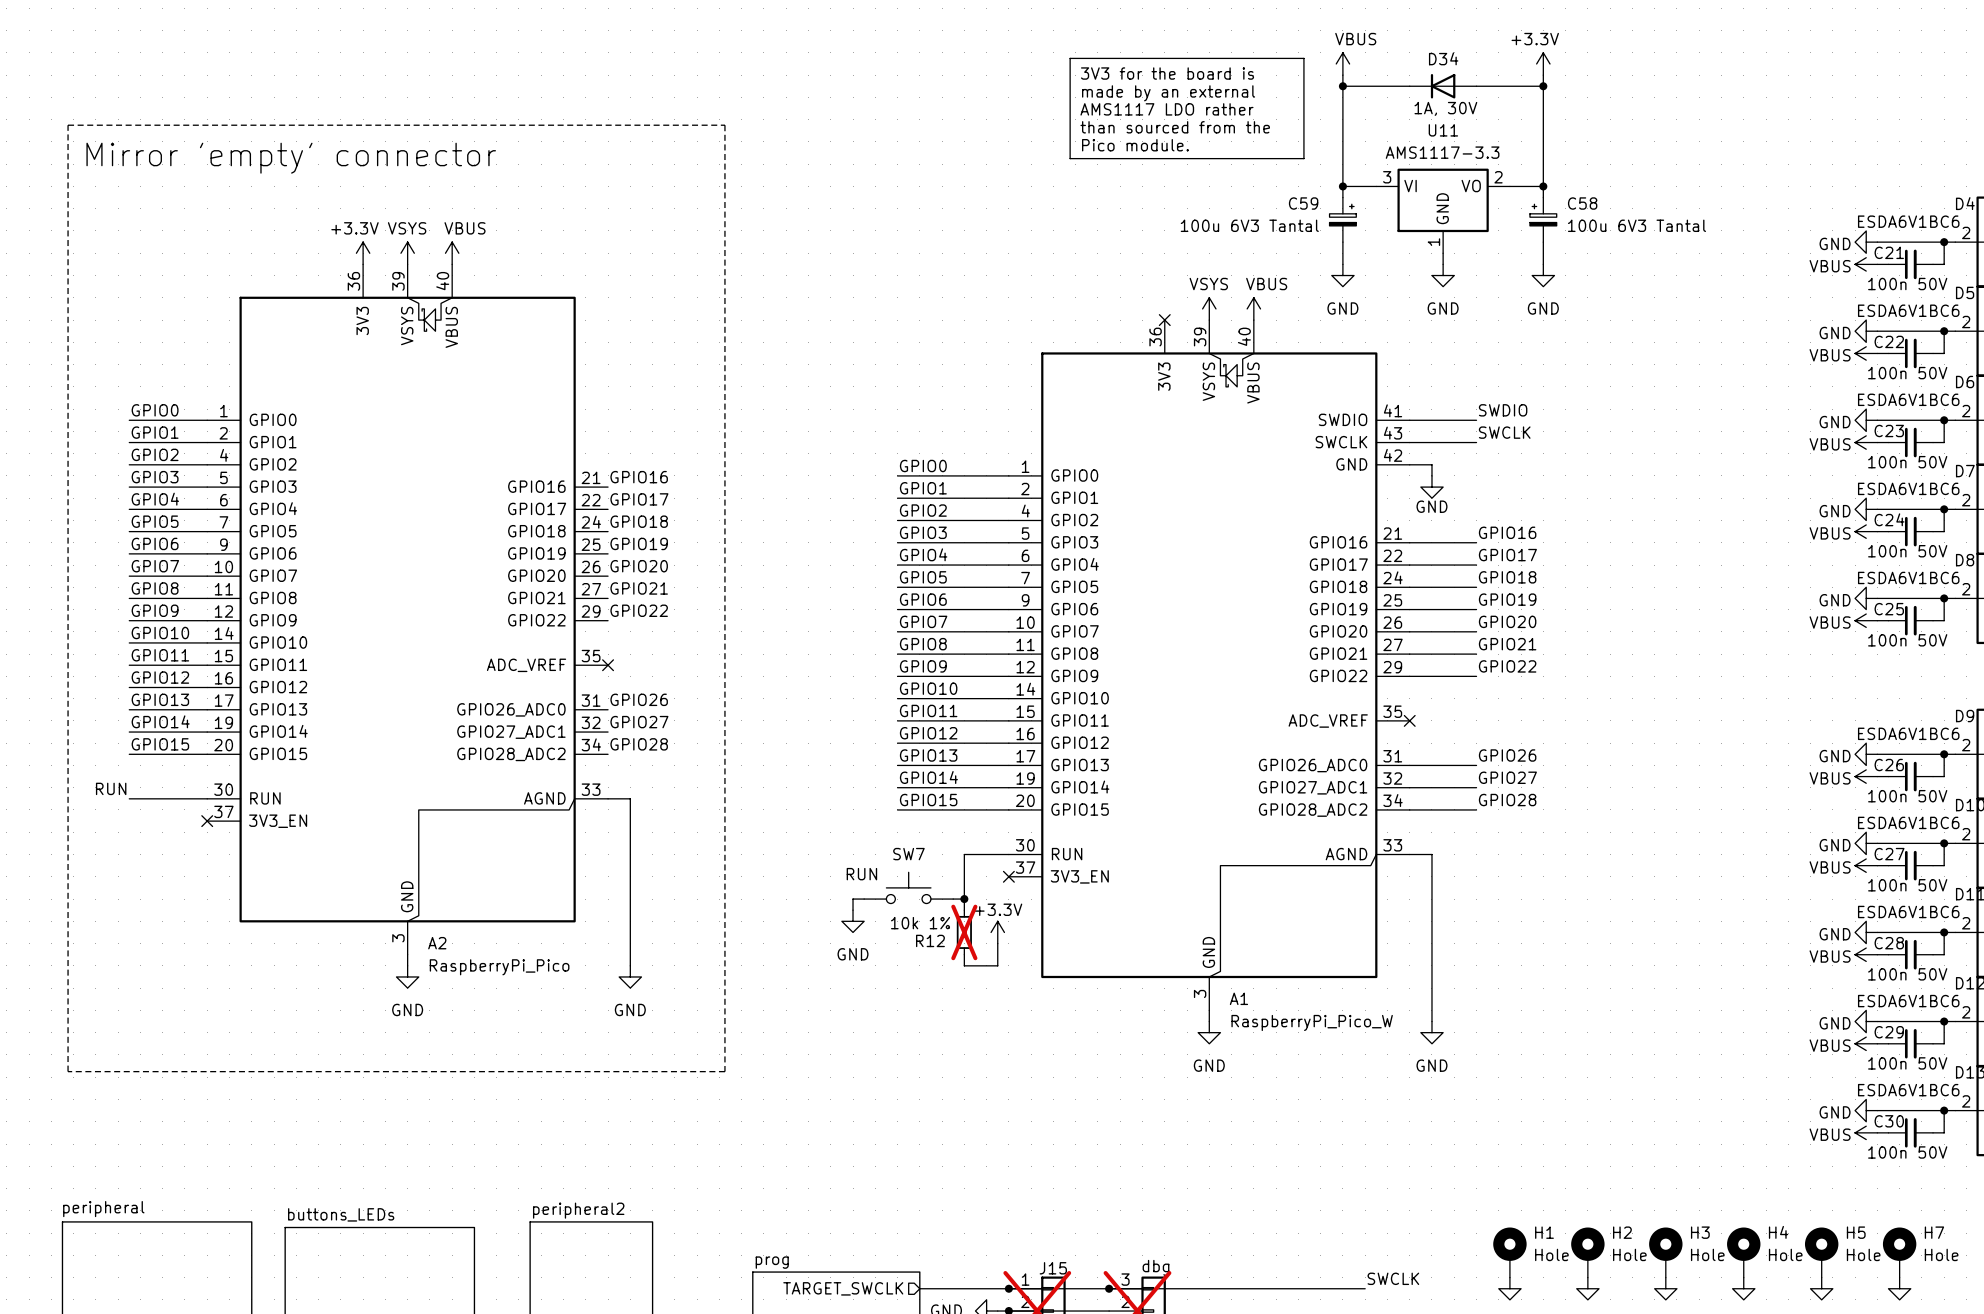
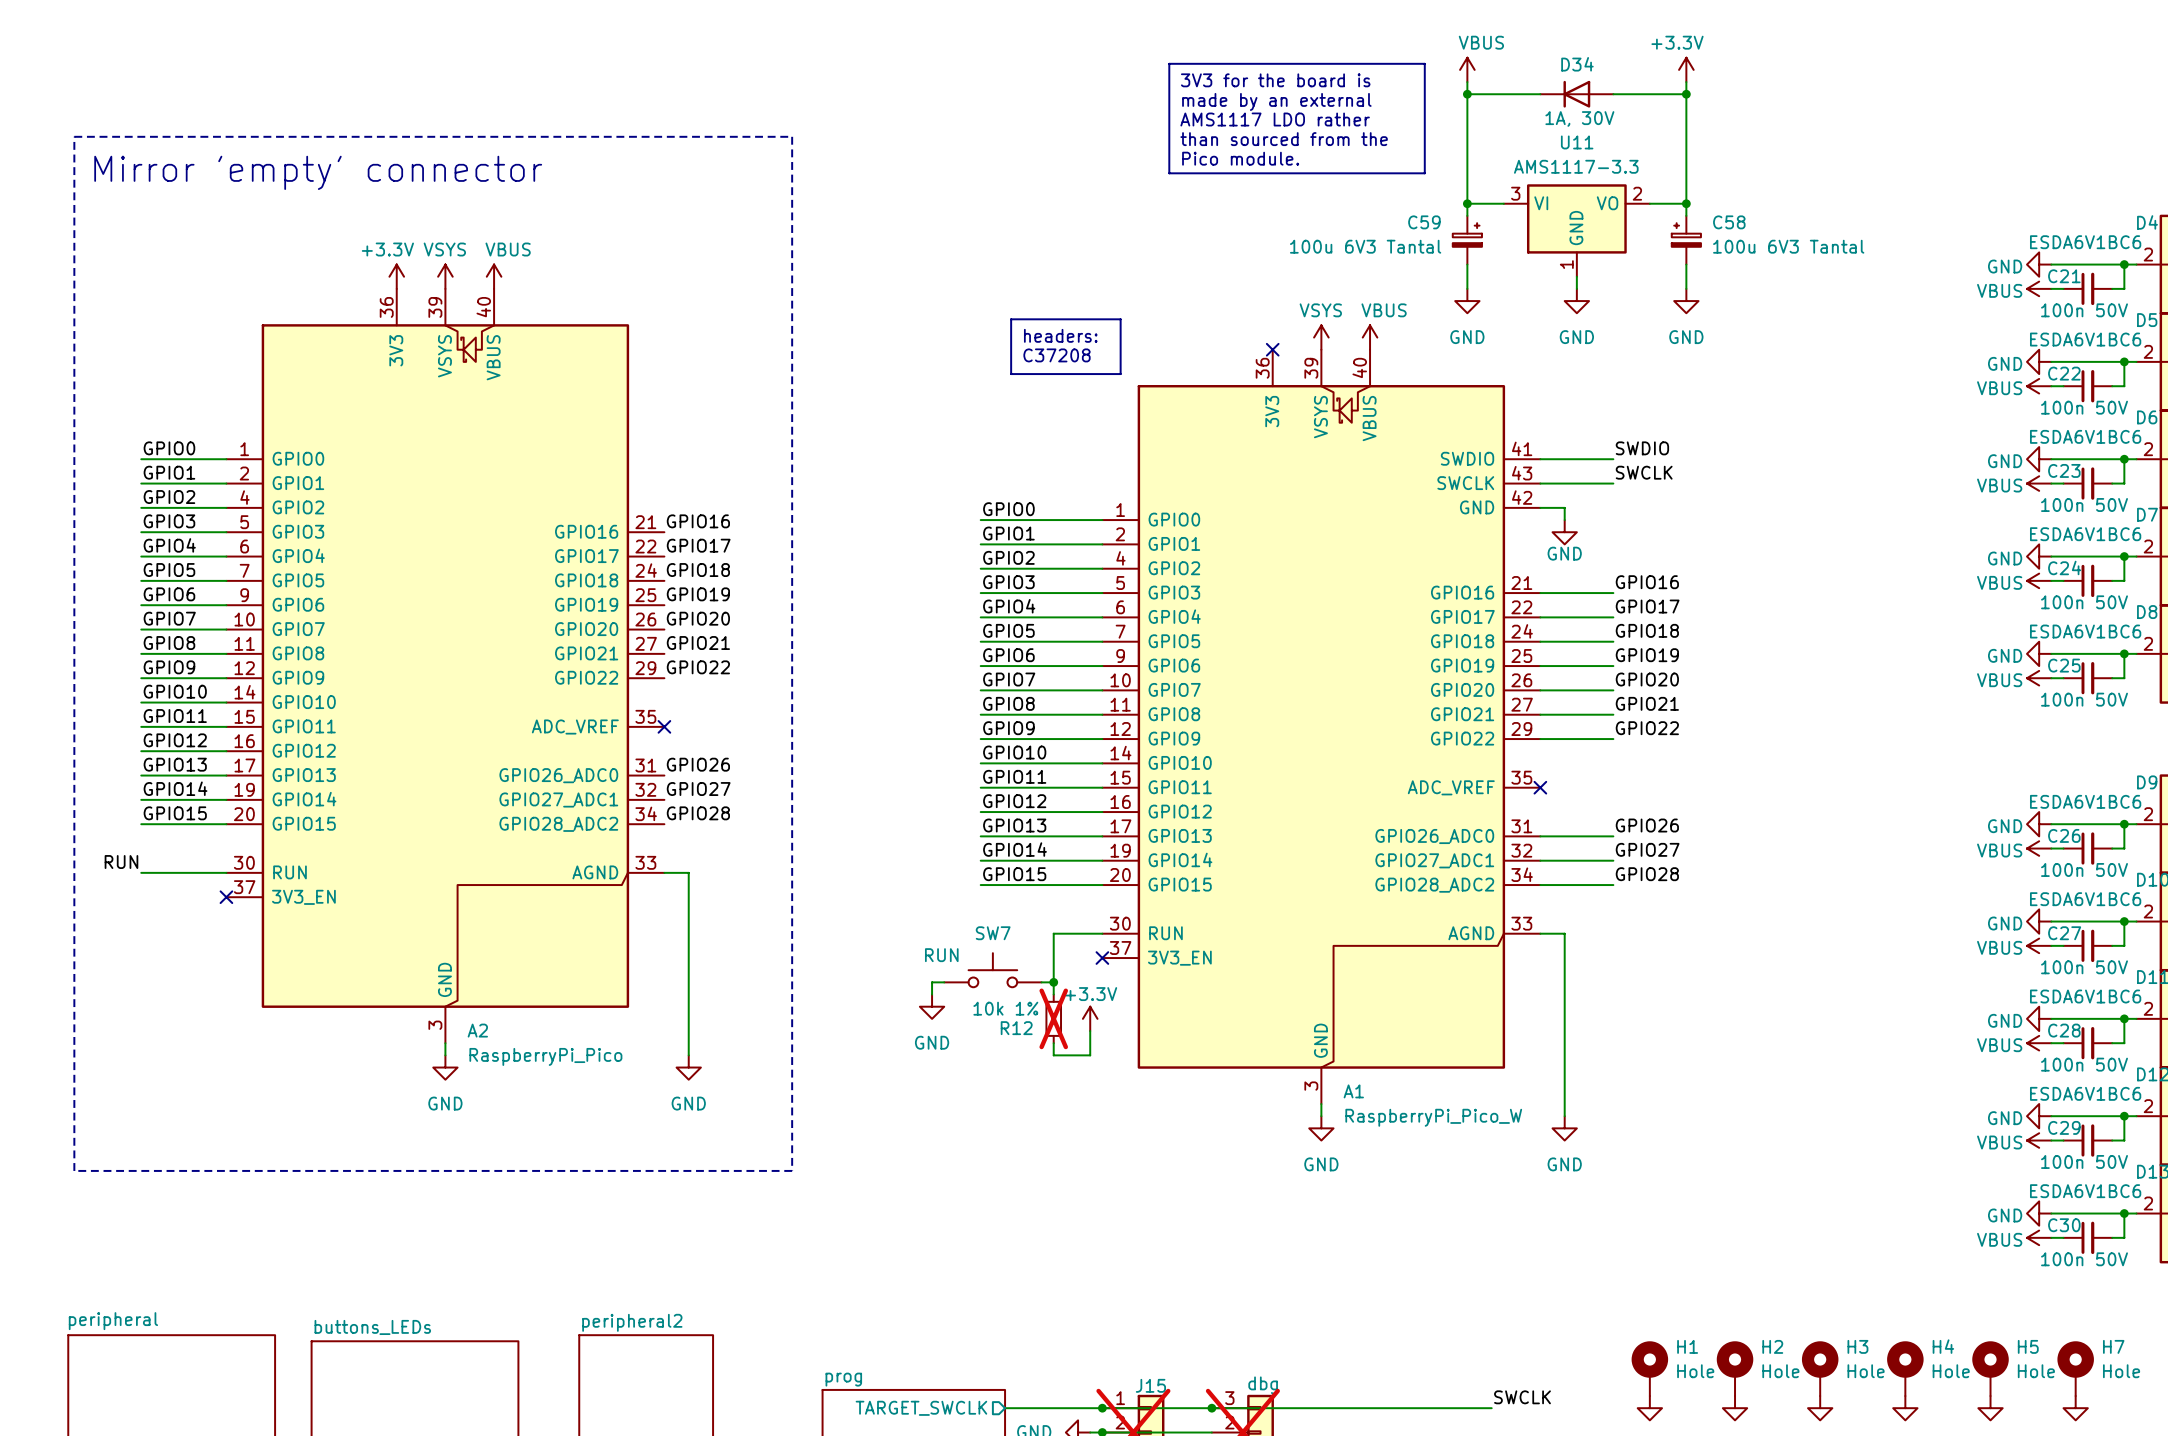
line: none -> (1011, 319) (1120, 319) (1120, 374) (1011, 374) (1011, 319)
text: none -> headers: (1060, 335)
text: none -> C37208 (1057, 355)

